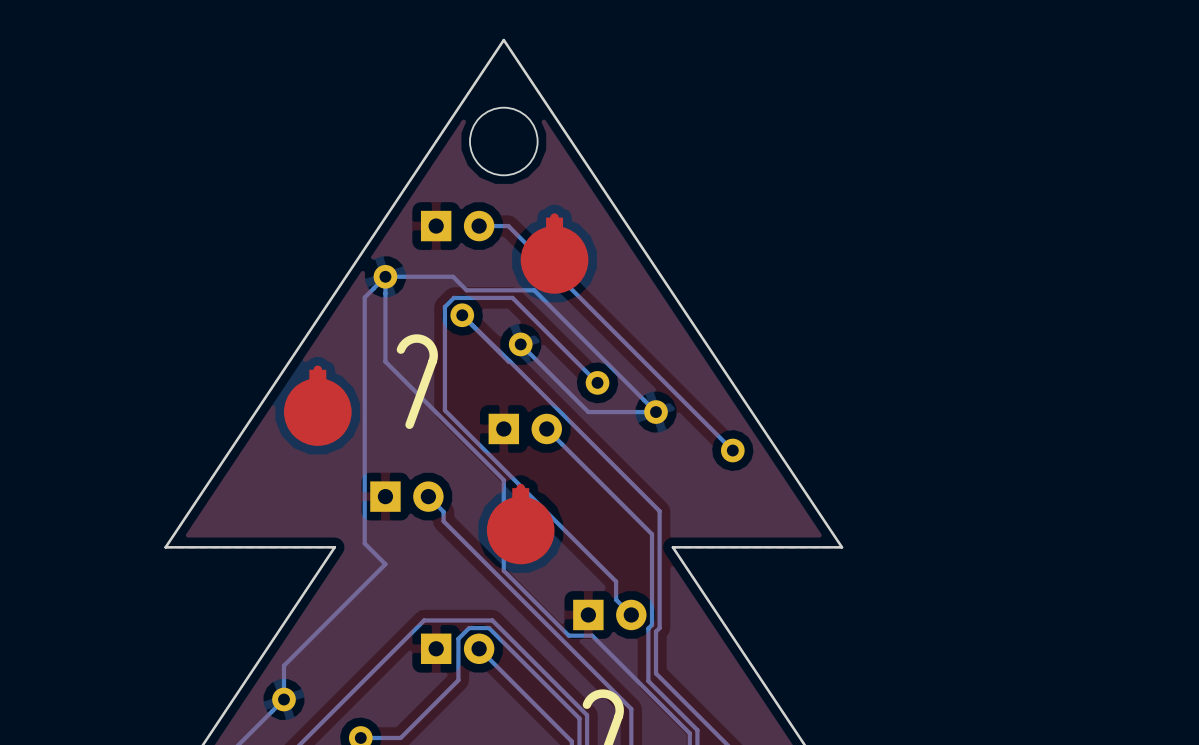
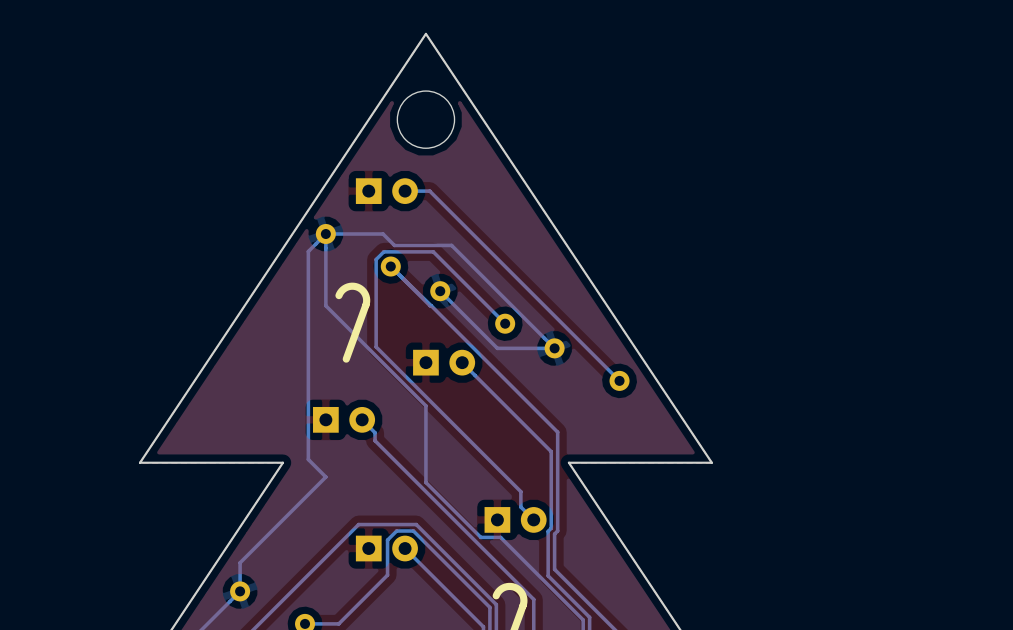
part: (554, 253) -> none
part: (317, 405) -> none
part: (520, 524) -> none

